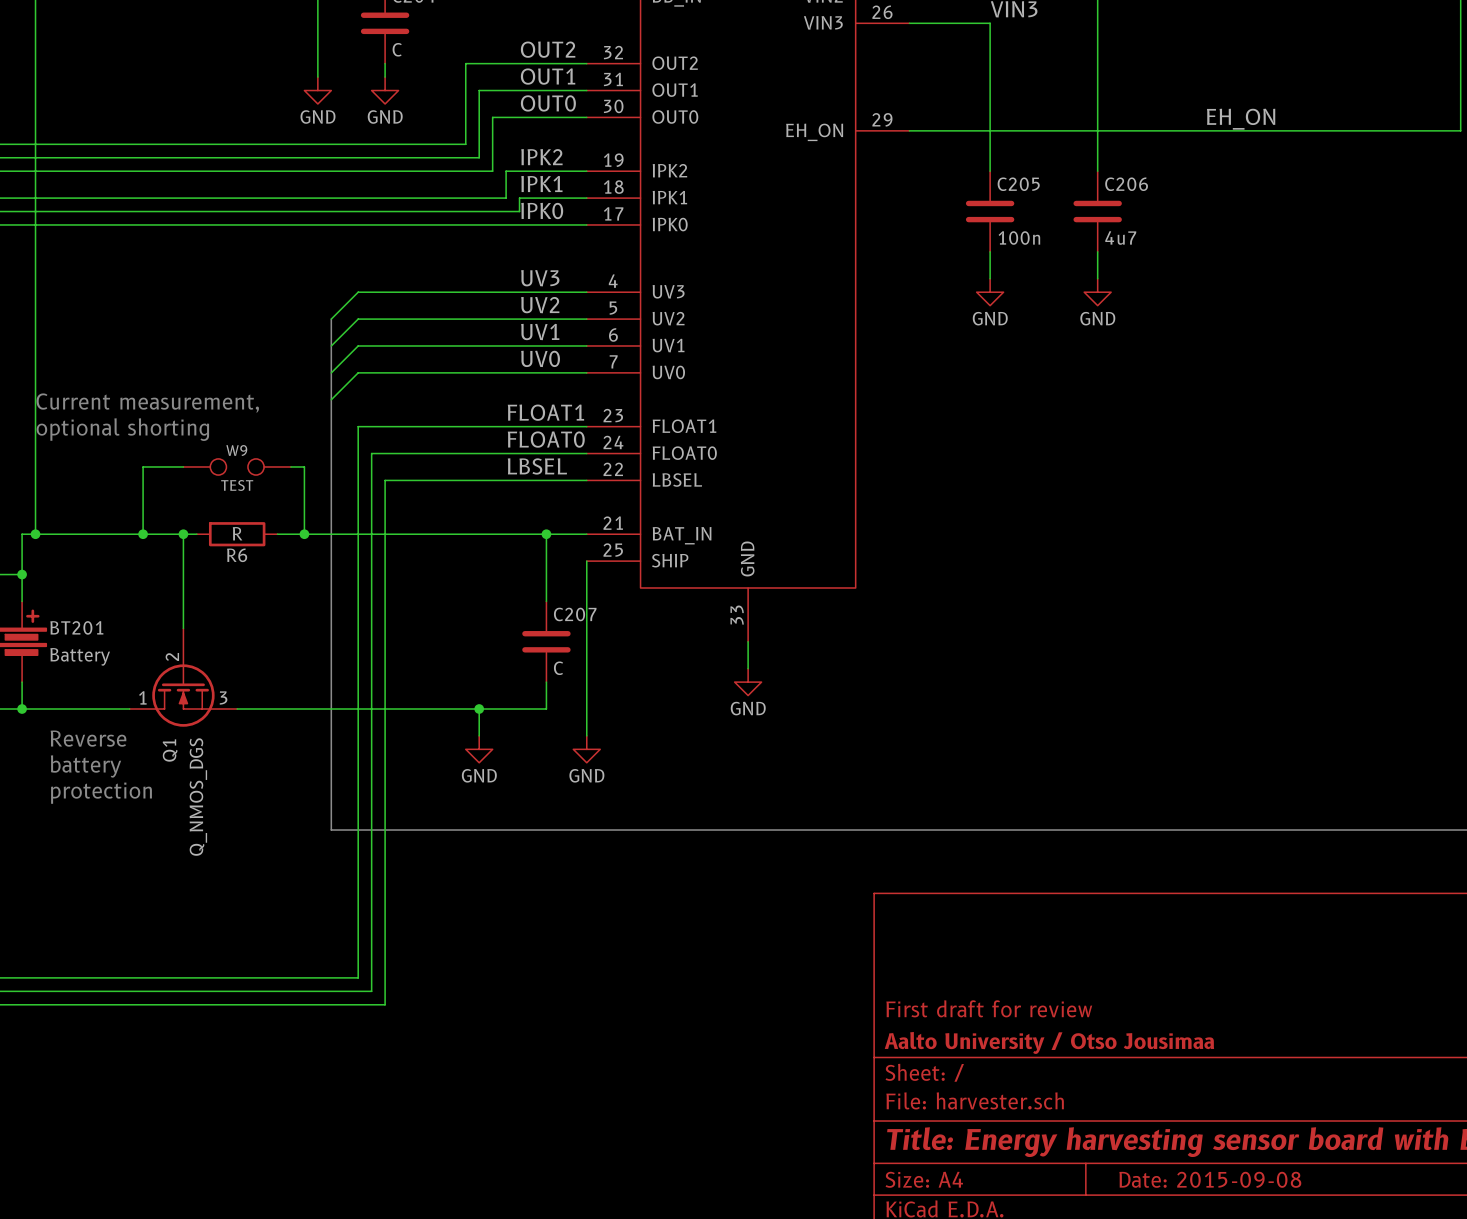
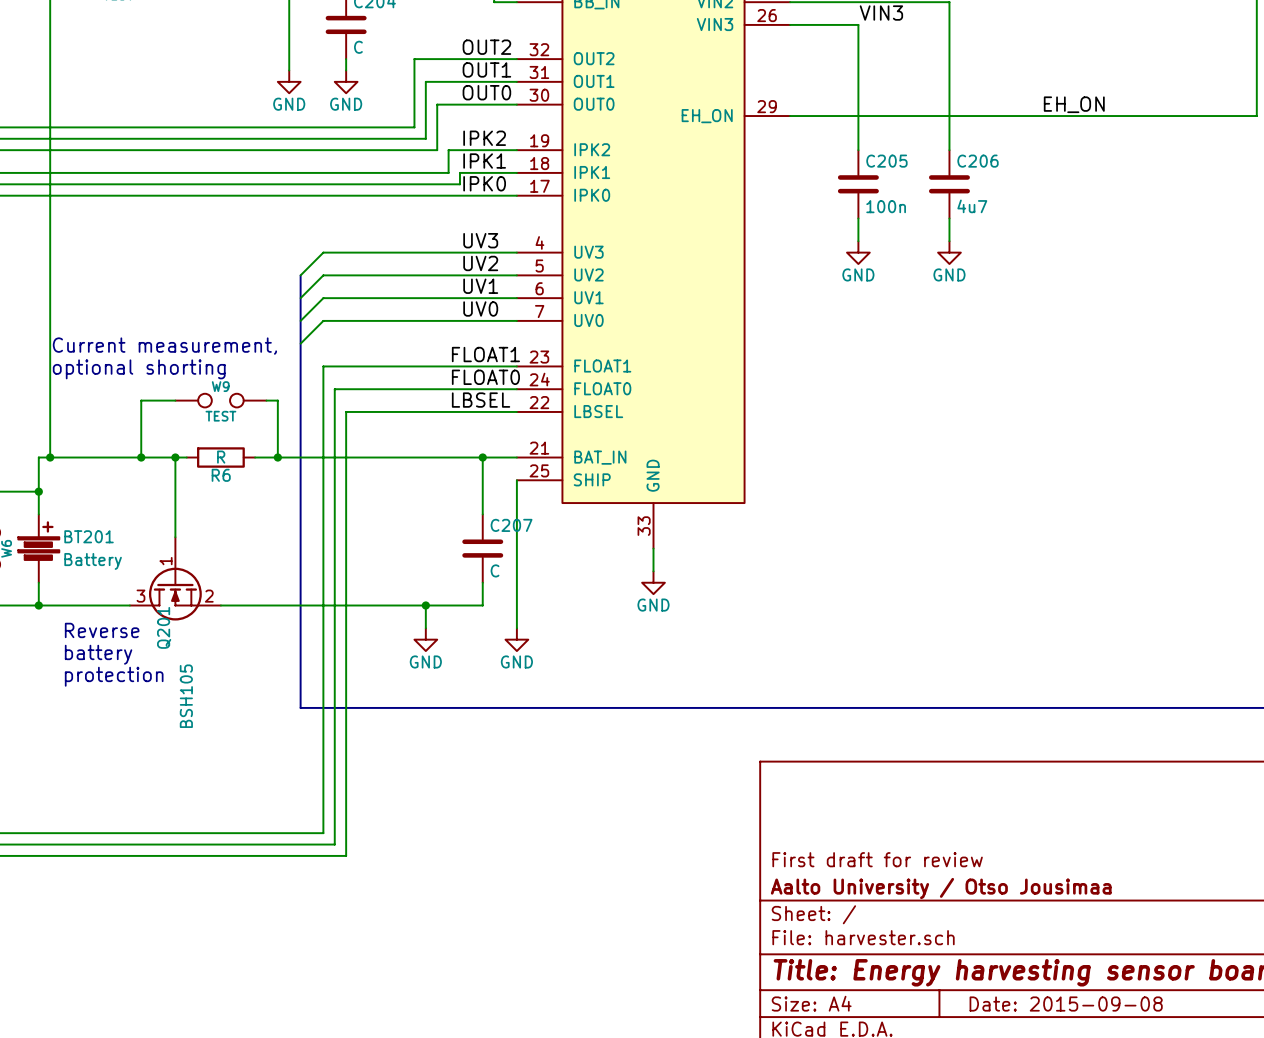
Q1 pin number: 2 (172, 656) -> 1 (166, 561)
Q1 pin number: 1 (142, 697) -> 3 (140, 596)
Q1 pin number: 3 (223, 698) -> 2 (209, 596)
Q1 name: Q1 (170, 750) -> Q201 (164, 627)
Q1 value: Q_NMOS_DGS (198, 797) -> BSH105 (186, 696)

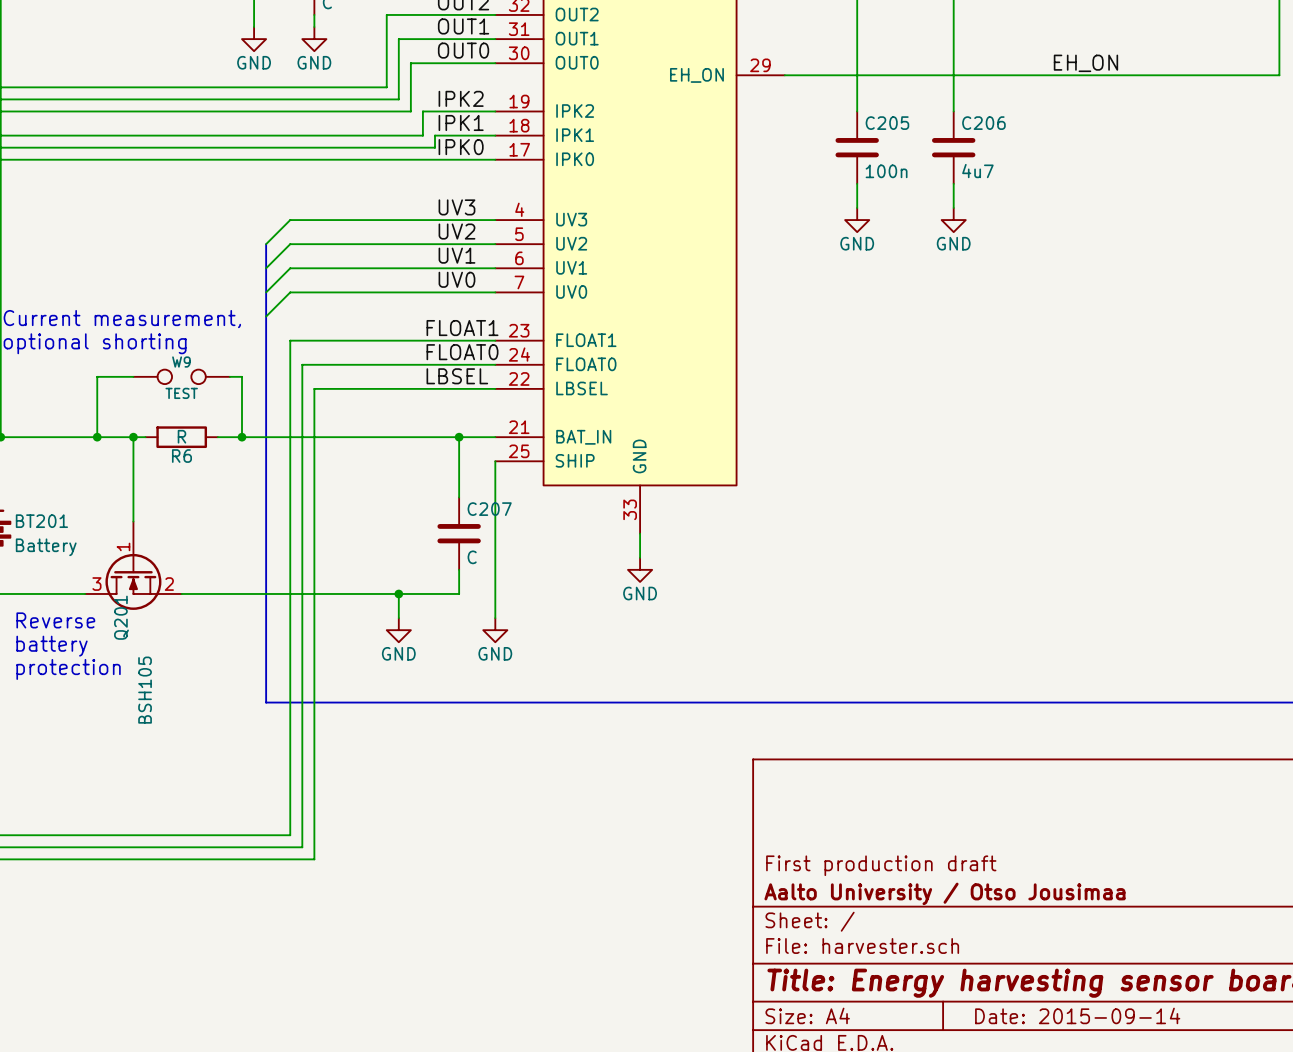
title block: First draft for review (877, 859) -> First production draft (881, 865)
title block: Date: 2015-09-08 (1066, 1004) -> Date: 2015-09-14 (1077, 1015)

